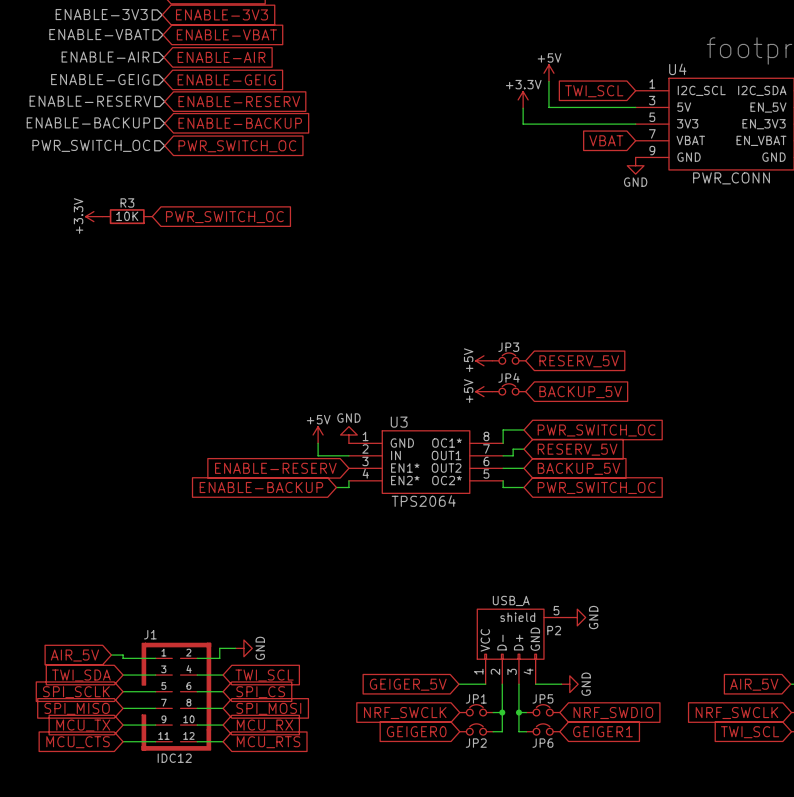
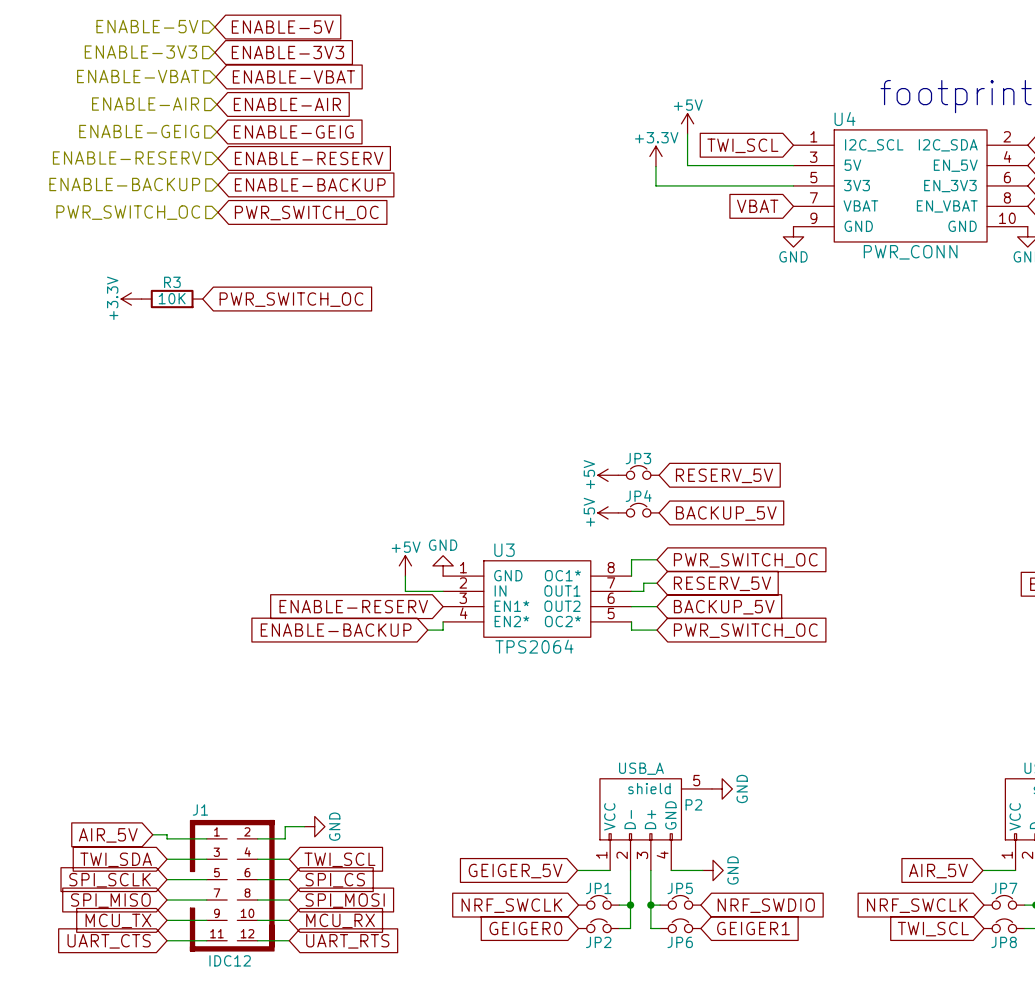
global label: MCU_CTS (78, 742) -> UART_CTS (109, 941)
global label: MCU_RTS (268, 742) -> UART_RTS (347, 941)

